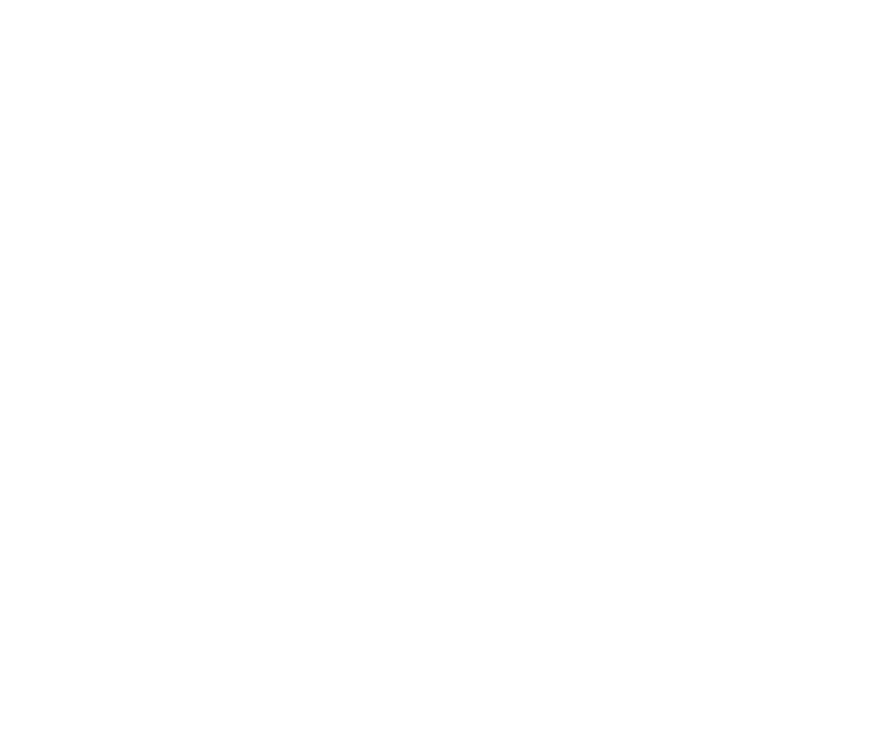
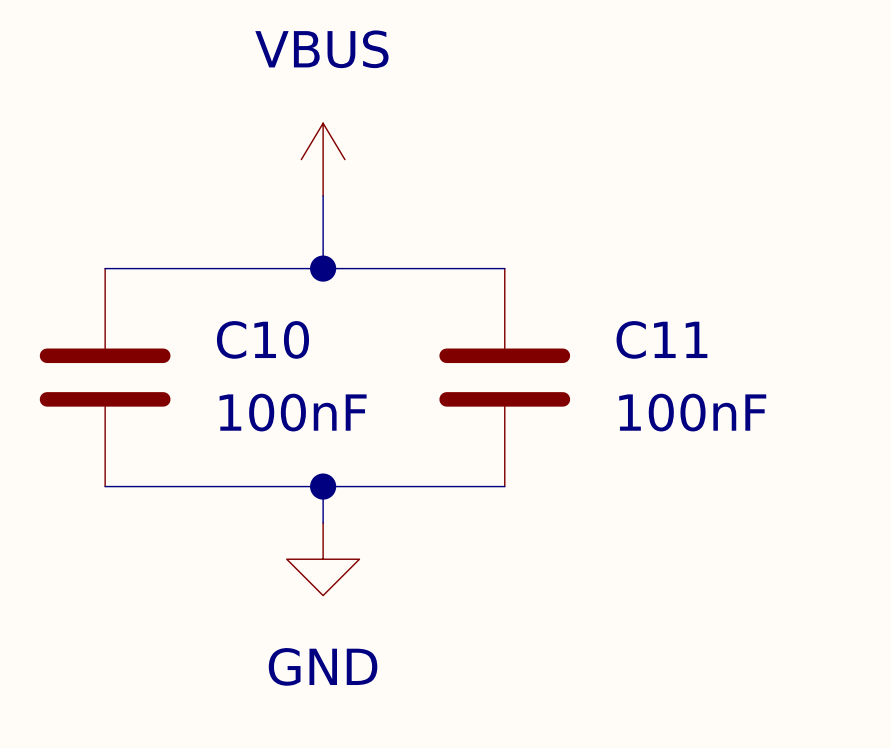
power symbol: none -> VBUS (323, 159)
wire: none -> (323, 195) (323, 268)
wire: none -> (105, 268) (504, 268)
junction: none -> (323, 268)
C10: none -> 100nF (105, 377)
C11: none -> 100nF (504, 377)
wire: none -> (105, 486) (504, 486)
wire: none -> (323, 486) (323, 522)
junction: none -> (323, 486)
power symbol: none -> GND (323, 559)

